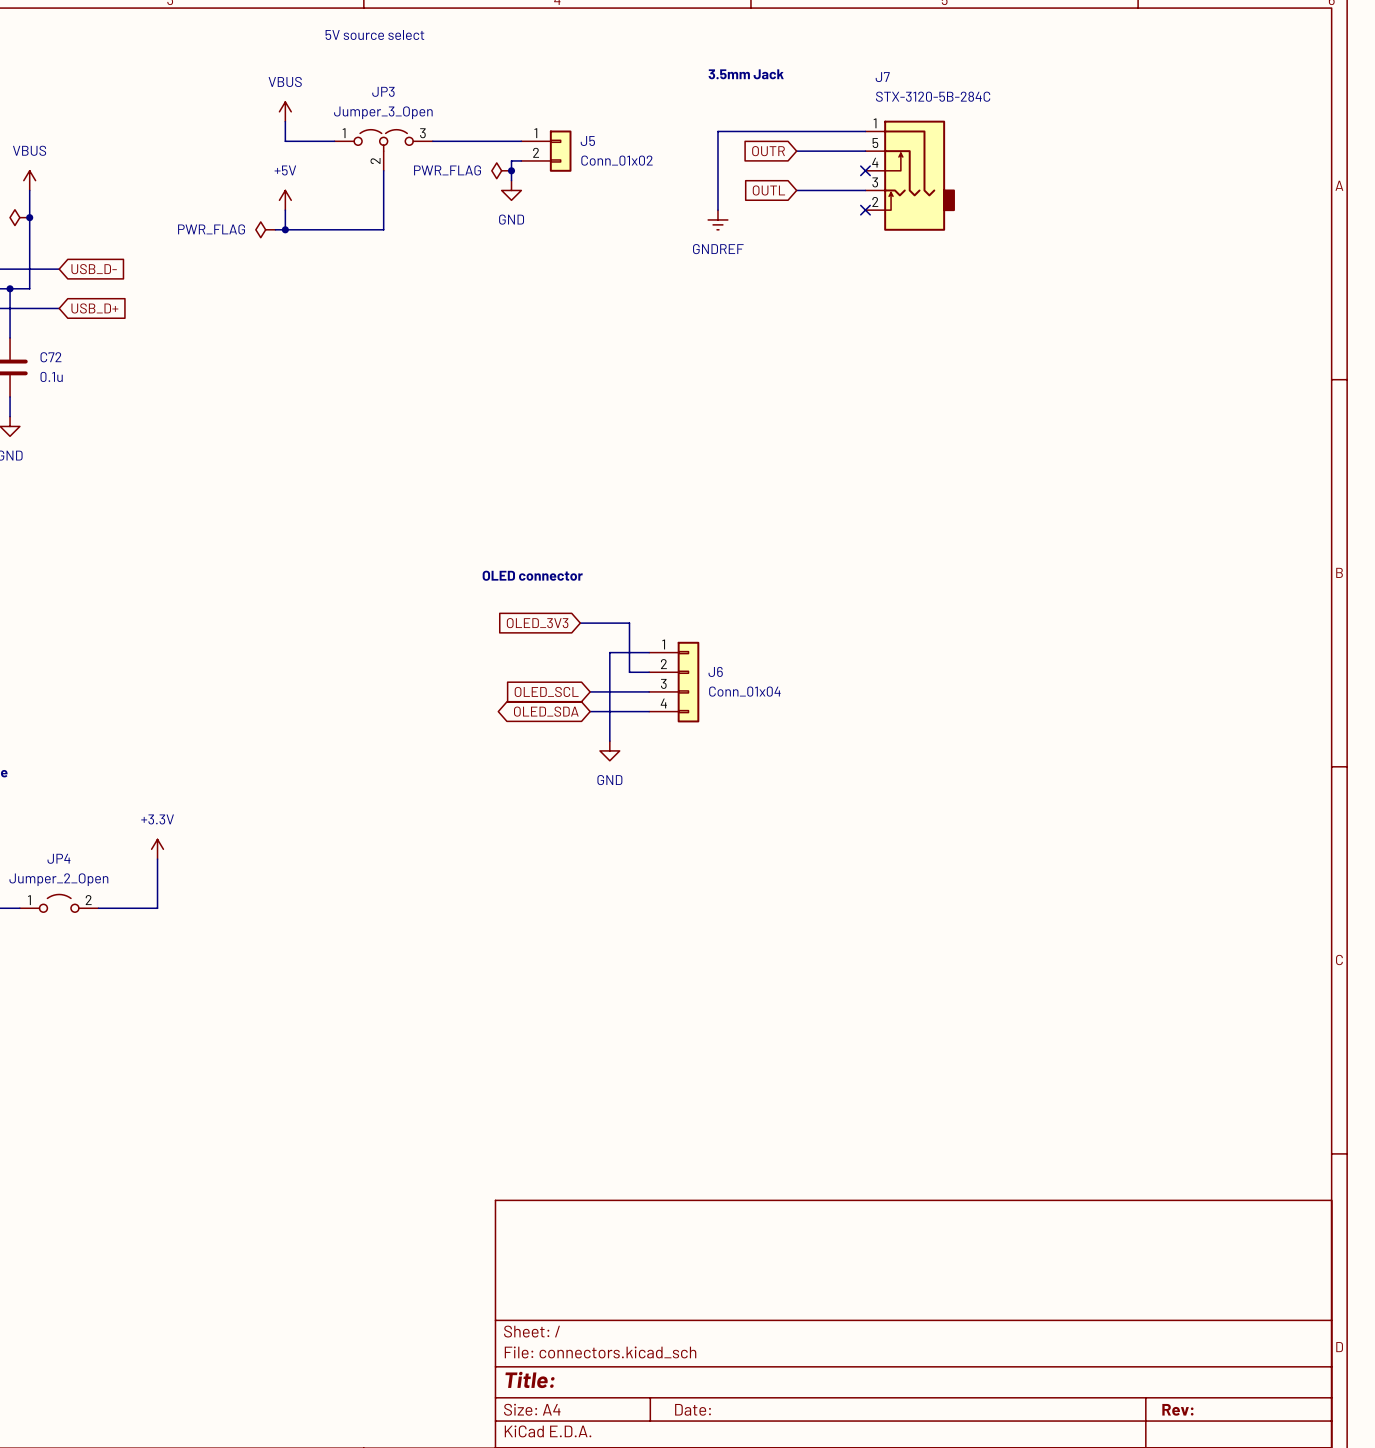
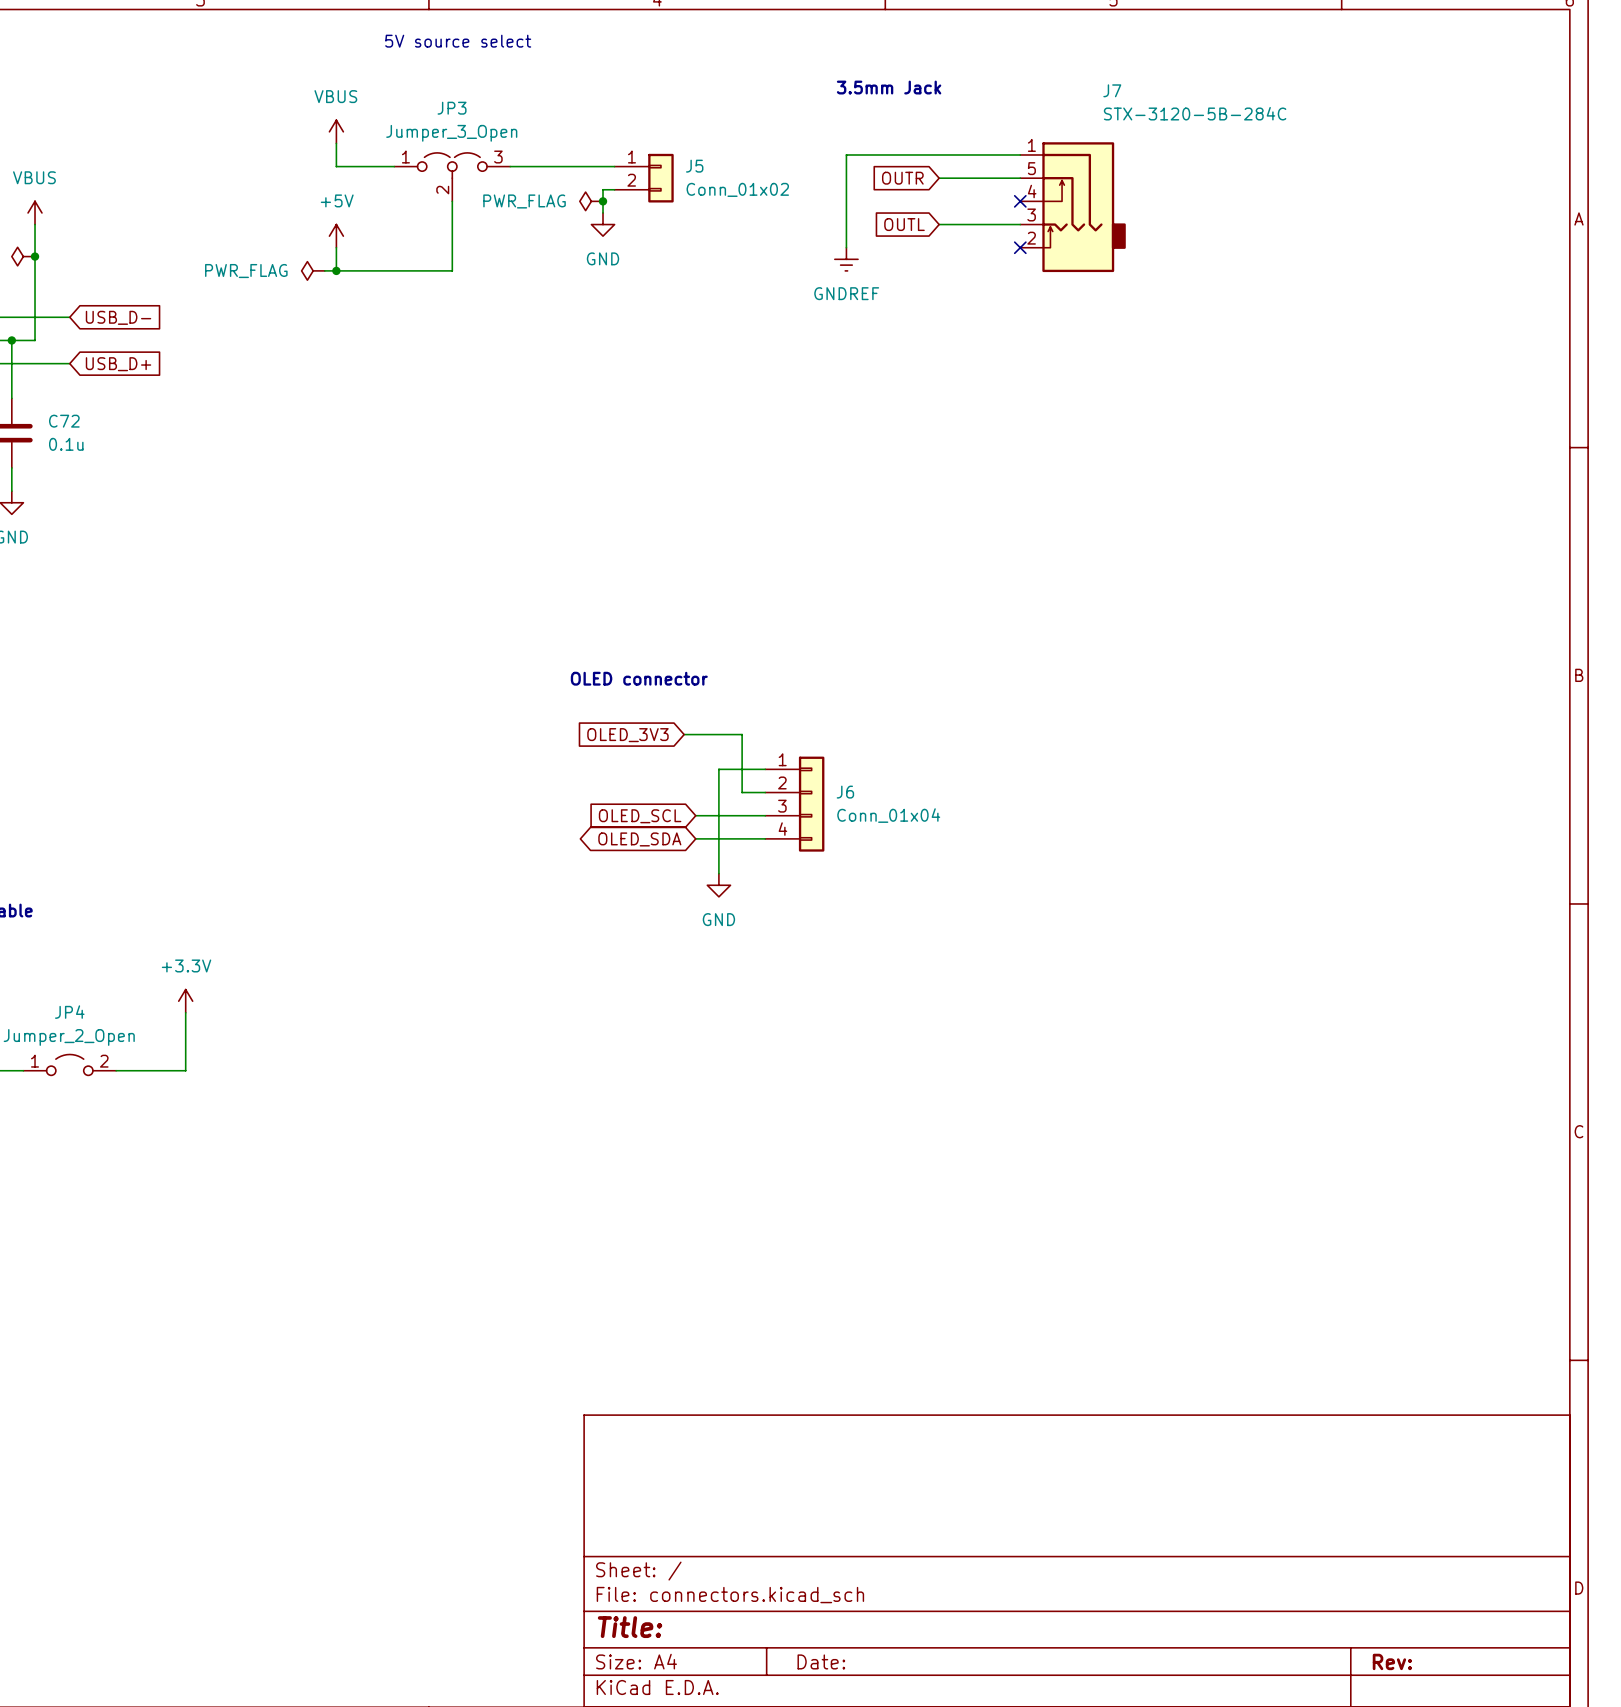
J7 name position: J7 (882, 77) -> J7 (1112, 90)
J7 value position: STX-3120-5B-284C (933, 96) -> STX-3120-5B-284C (1195, 113)

